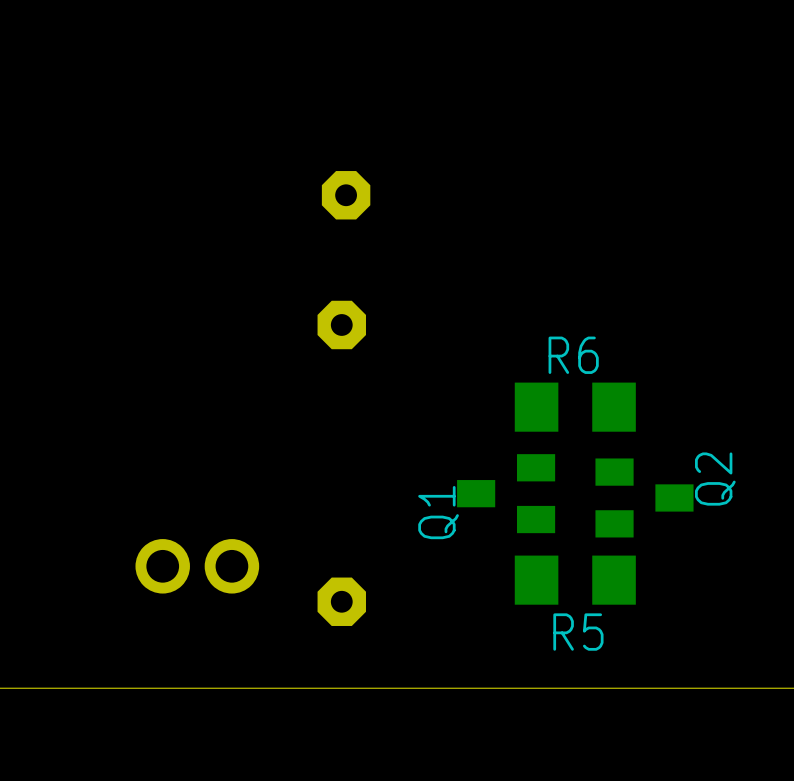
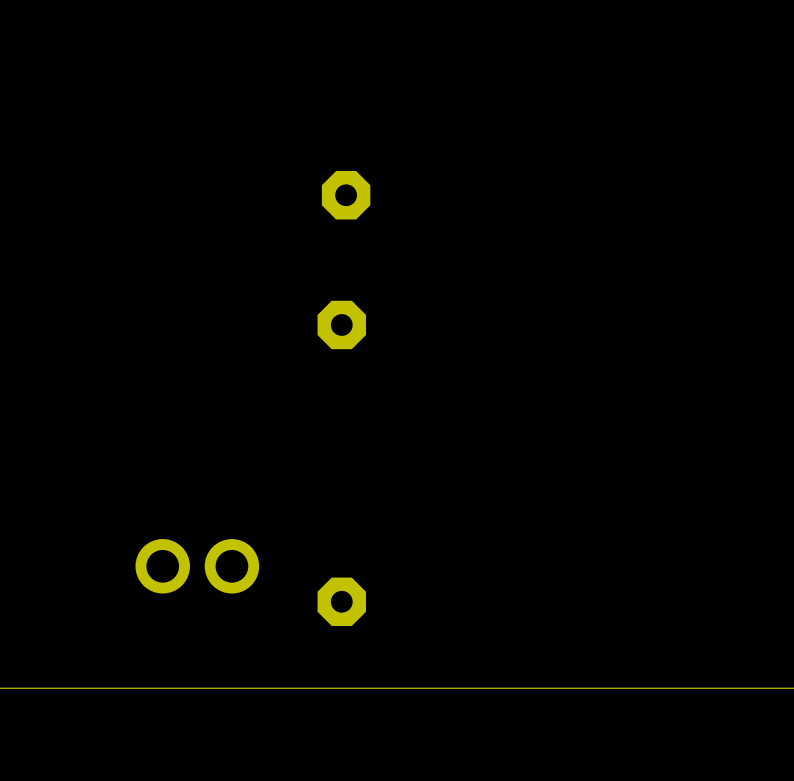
R6: (575, 407) -> none
Q1: (506, 493) -> none
Q2: (644, 497) -> none
R5: (575, 580) -> none

